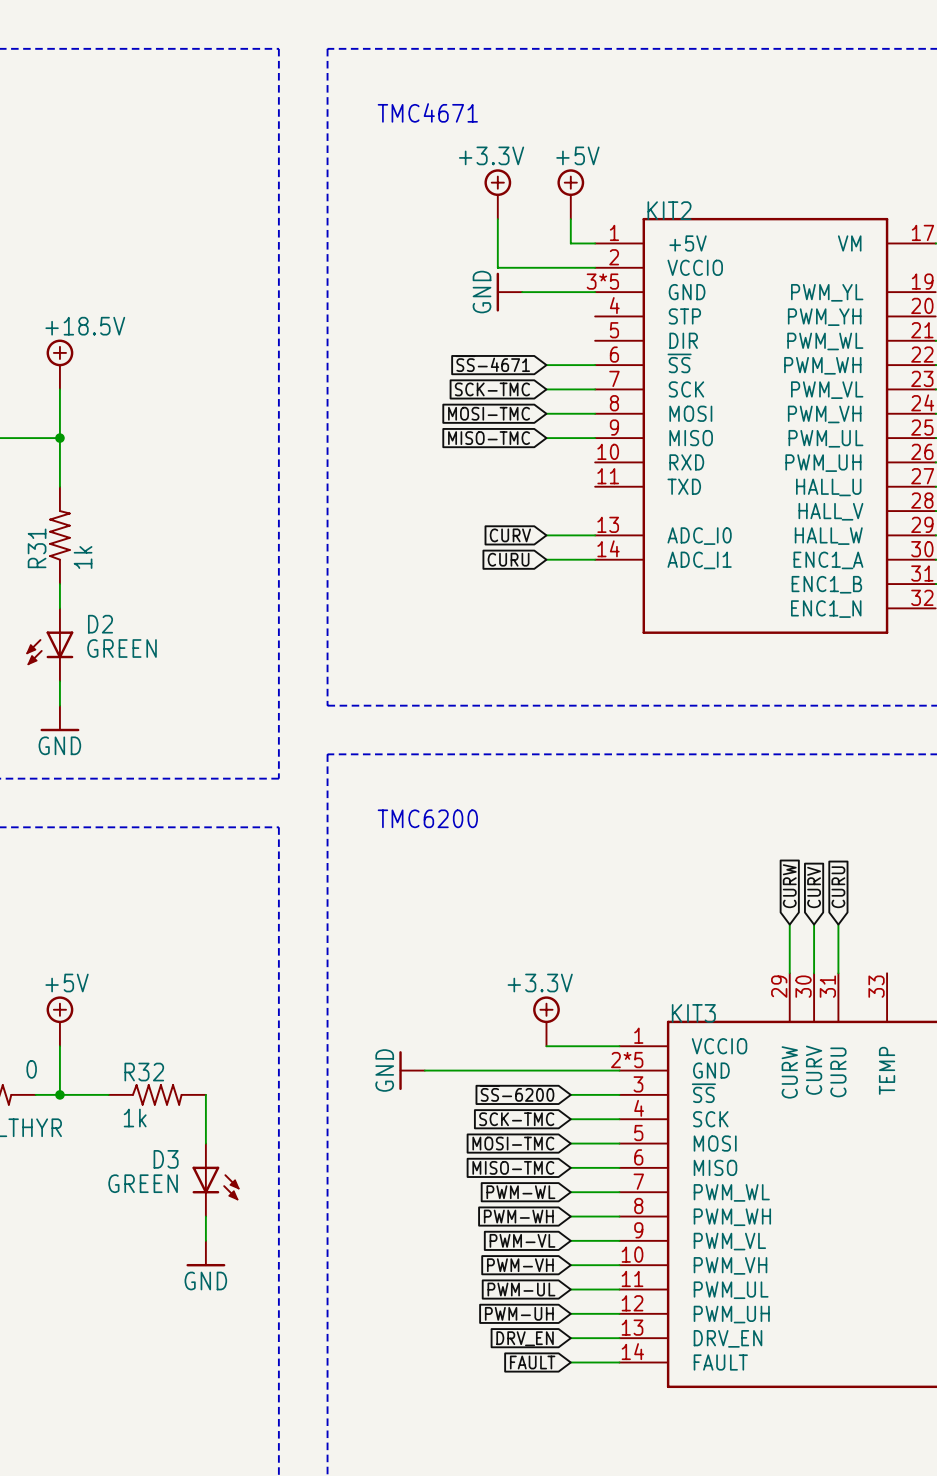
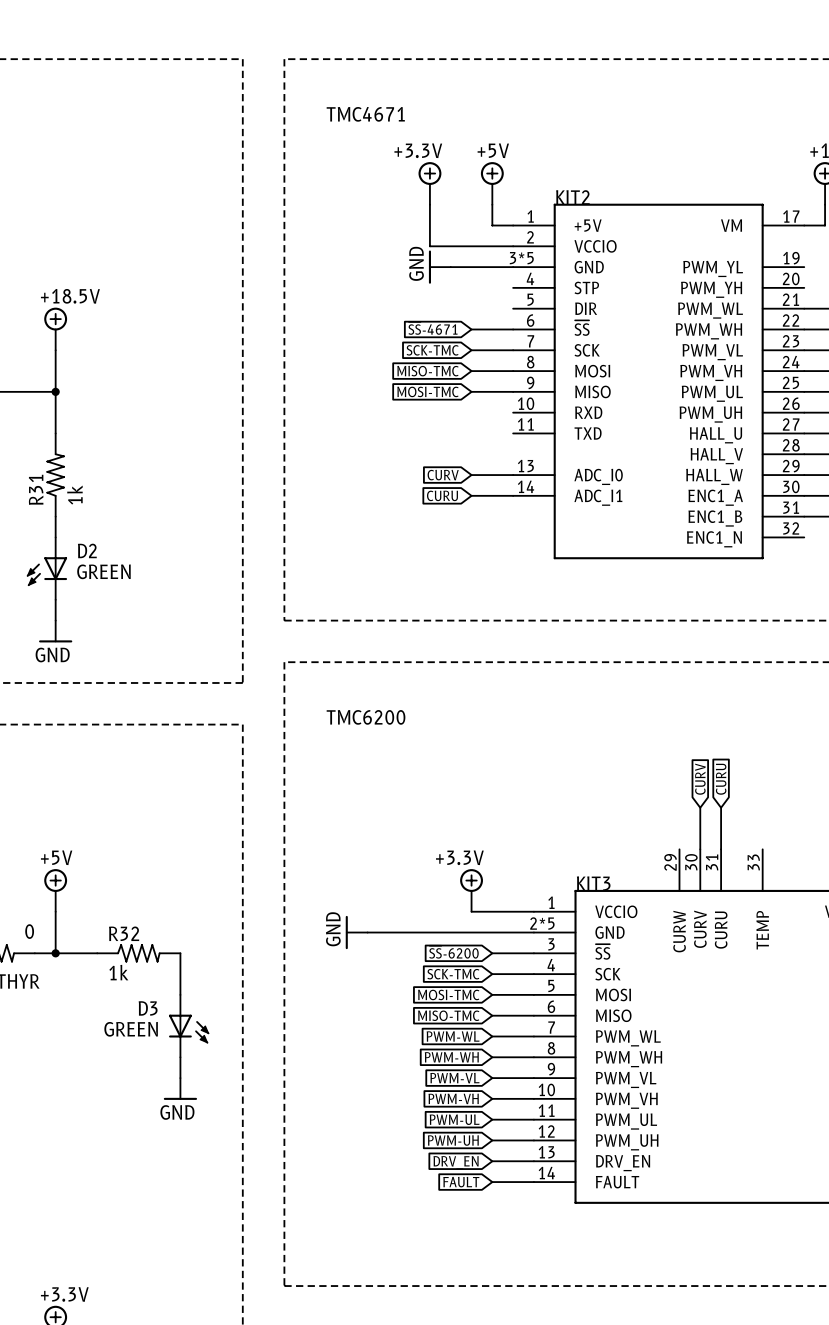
global label: MOSI-TMC (489, 413) -> MISO-TMC (427, 371)
global label: MISO-TMC (489, 438) -> MOSI-TMC (427, 391)
global label: CURW (789, 886) -> none
wire: (789, 924) (789, 973) -> none

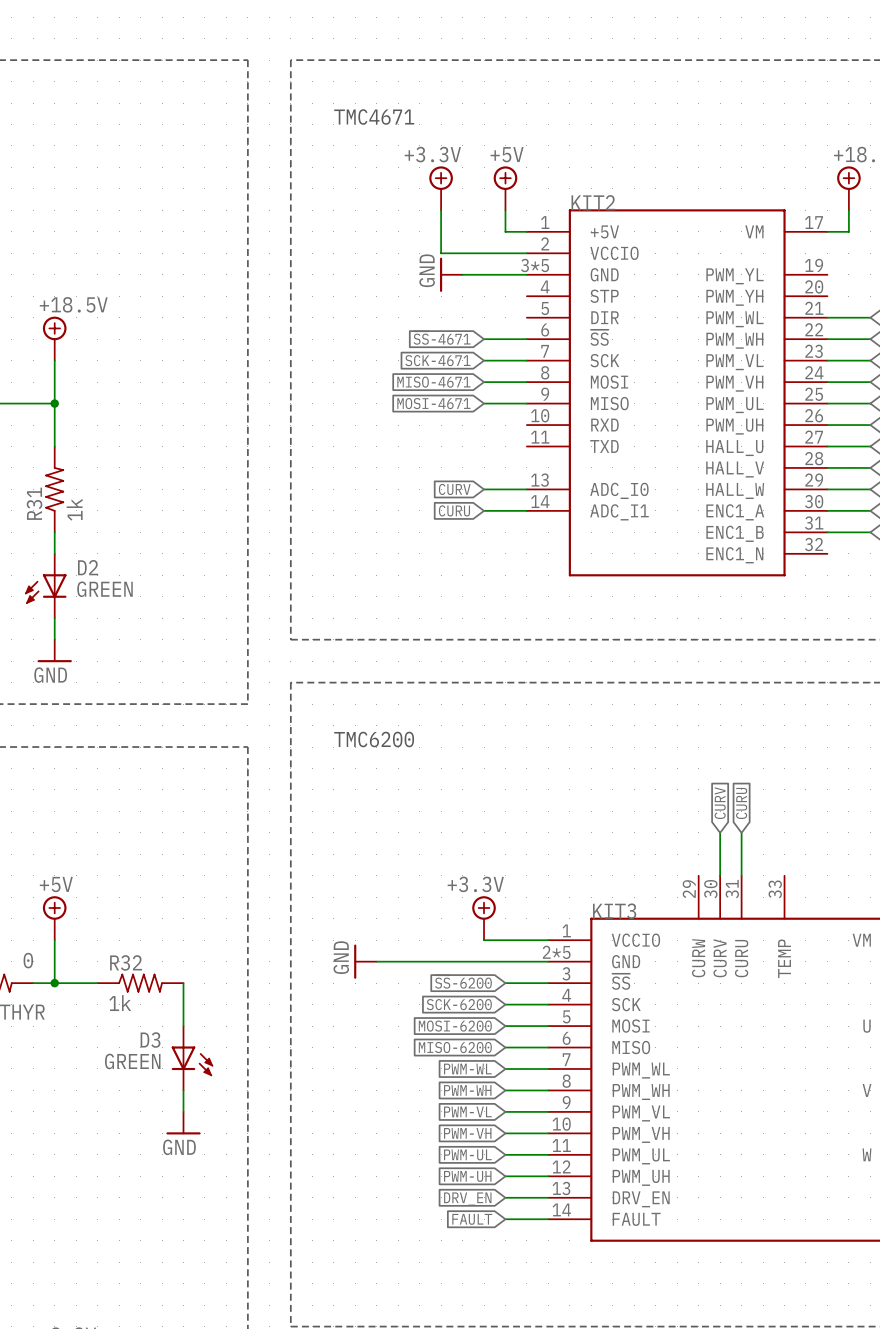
global label: SCK-TMC (432, 350) -> SCK-4671 (437, 360)
global label: MISO-TMC (427, 371) -> MISO-4671 (433, 382)
global label: MOSI-TMC (427, 391) -> MOSI-4671 (433, 403)
global label: SCK-TMC (453, 974) -> SCK-6200 (459, 1004)
global label: MOSI-TMC (448, 994) -> MOSI-6200 (455, 1026)
global label: MISO-TMC (448, 1015) -> MISO-6200 (455, 1047)

